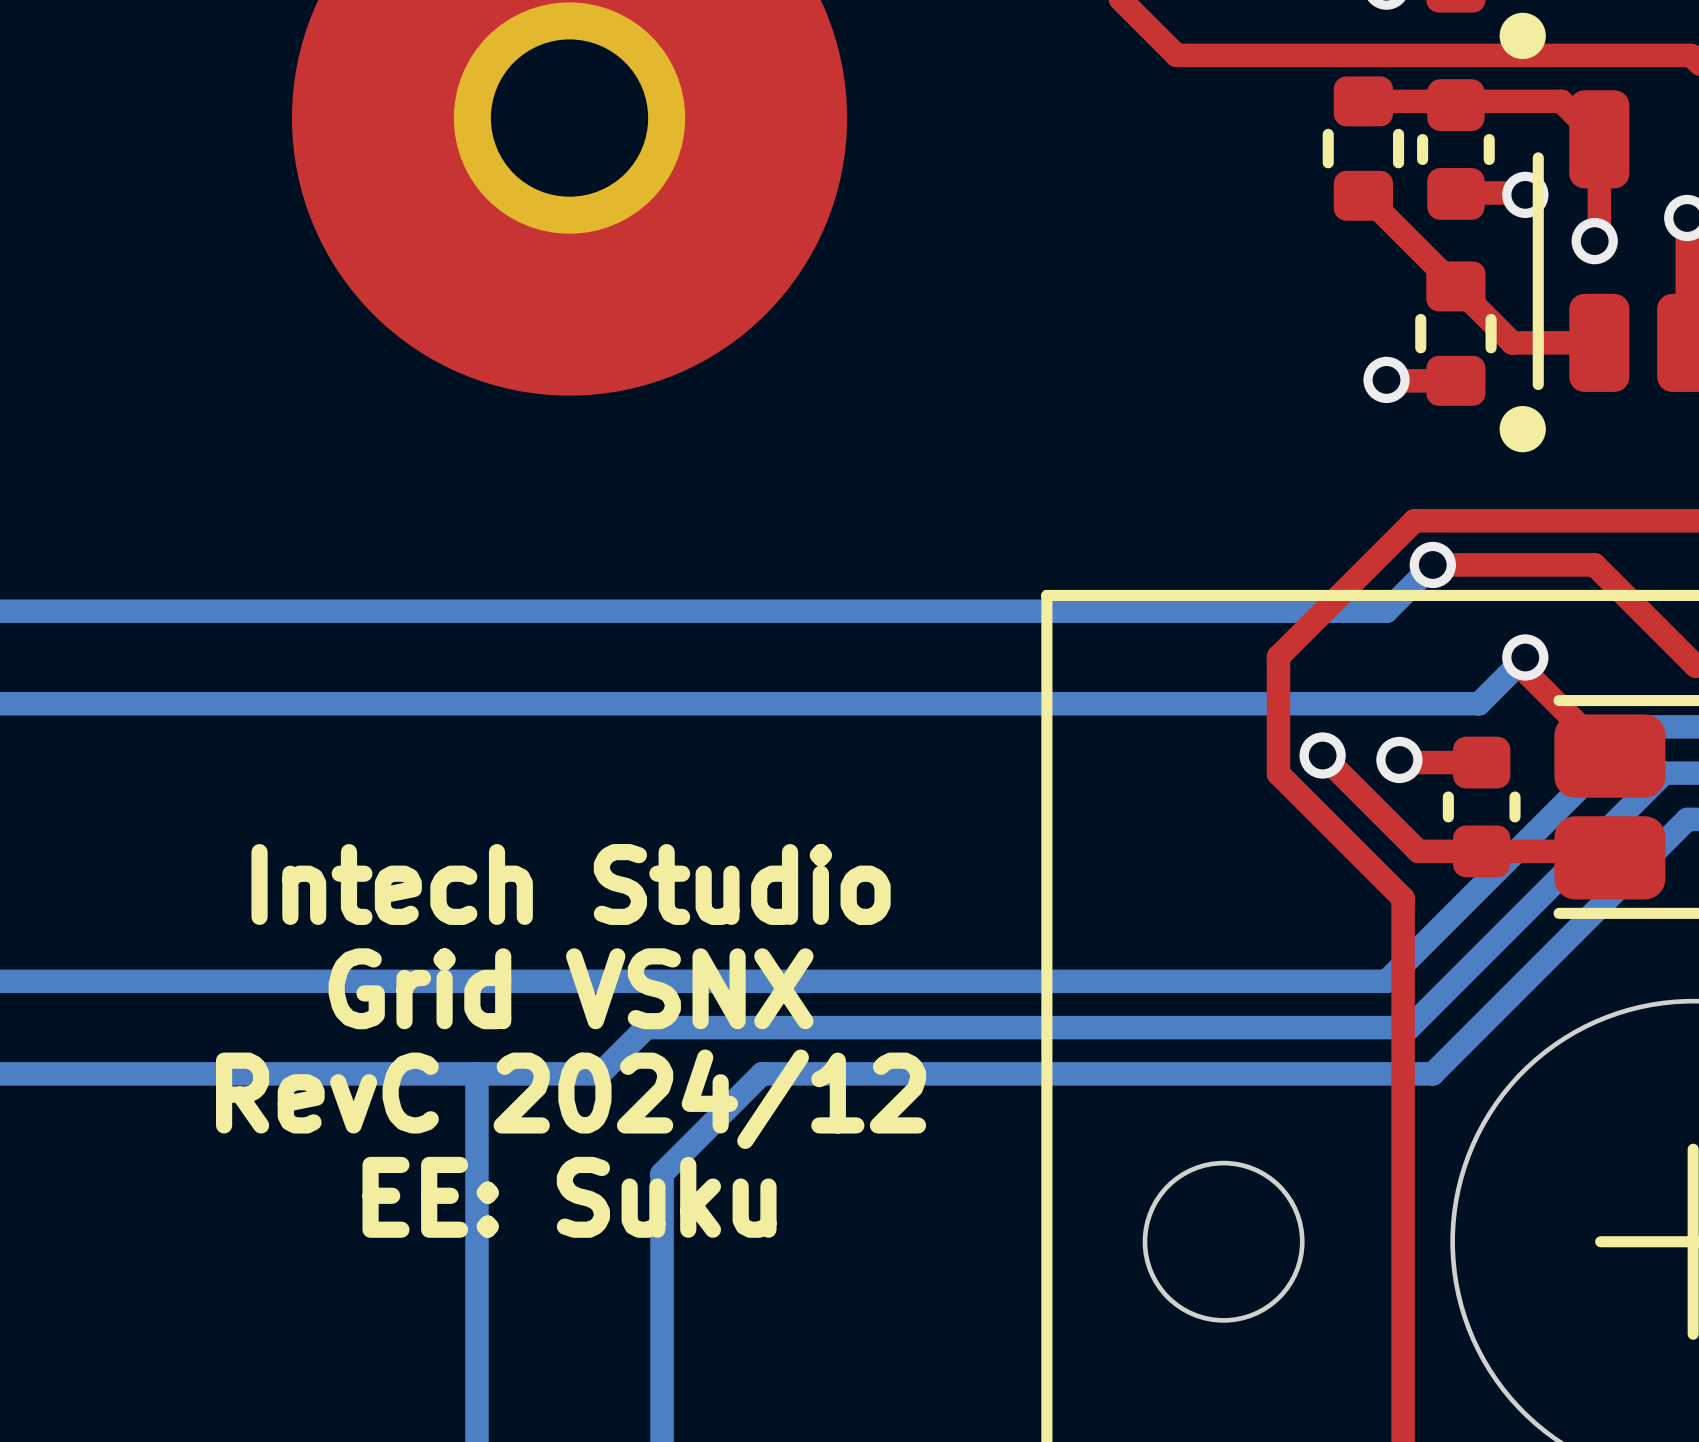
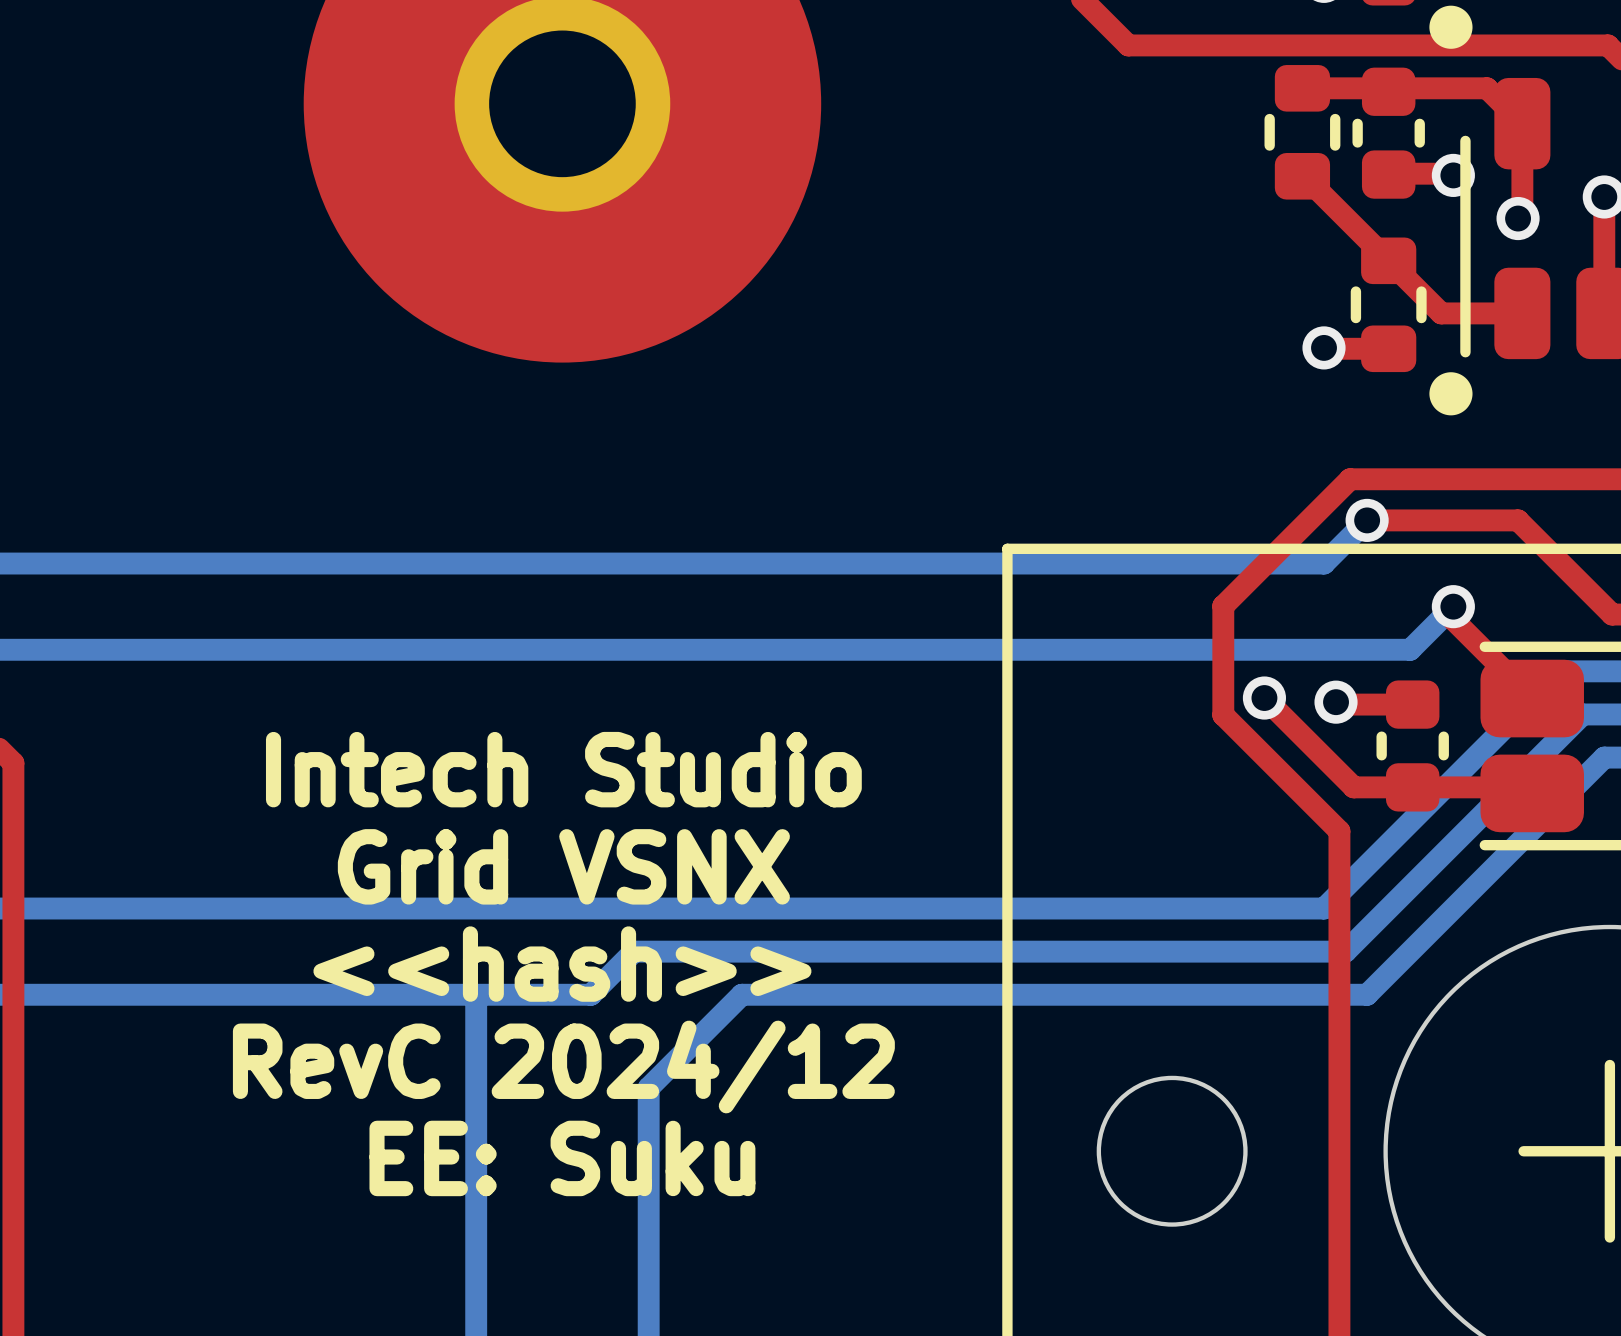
text position: Intech Studio (571, 884) -> Intech Studio (563, 769)
text position: Grid VSNX (571, 988) -> Grid VSNX (563, 866)
text: none -> <<hash>> (562, 964)
text position: RevC 2024/12 (571, 1099) -> RevC 2024/12 (563, 1067)
text position: EE: Suku (569, 1197) -> EE: Suku (562, 1158)

